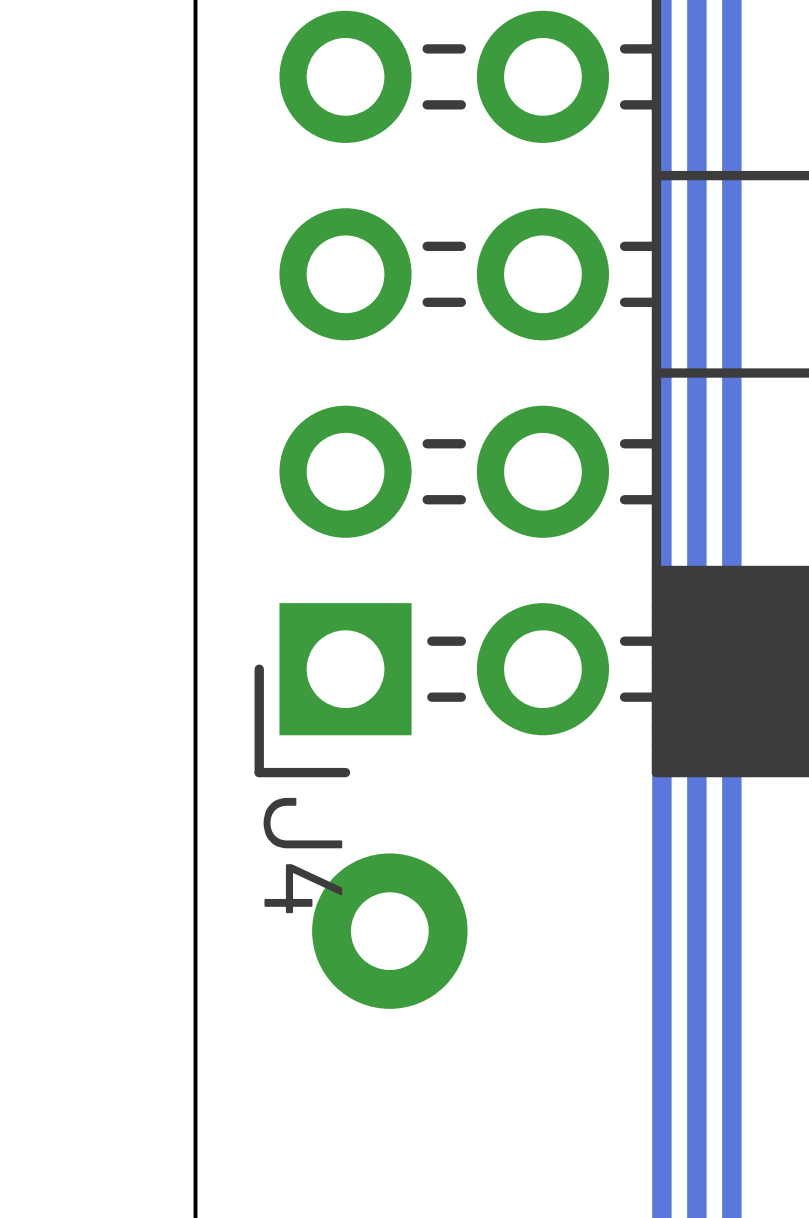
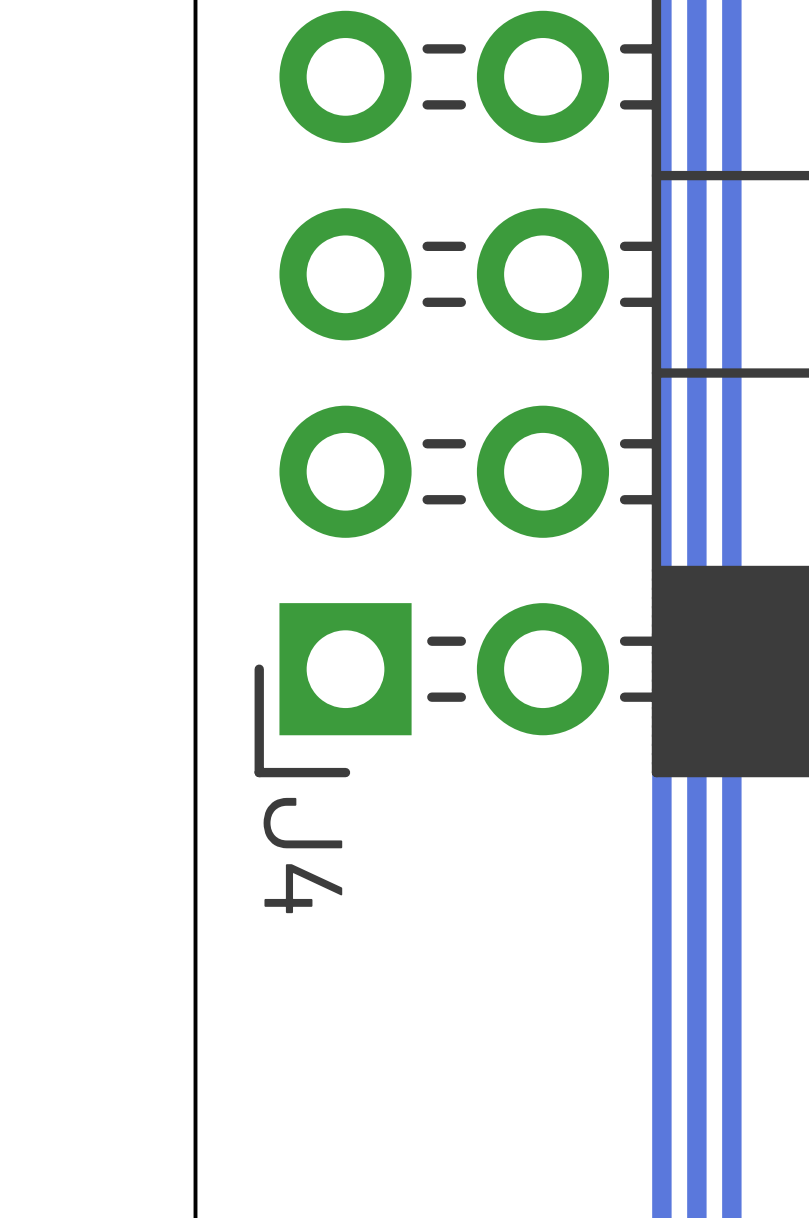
via: (389, 931) -> none

